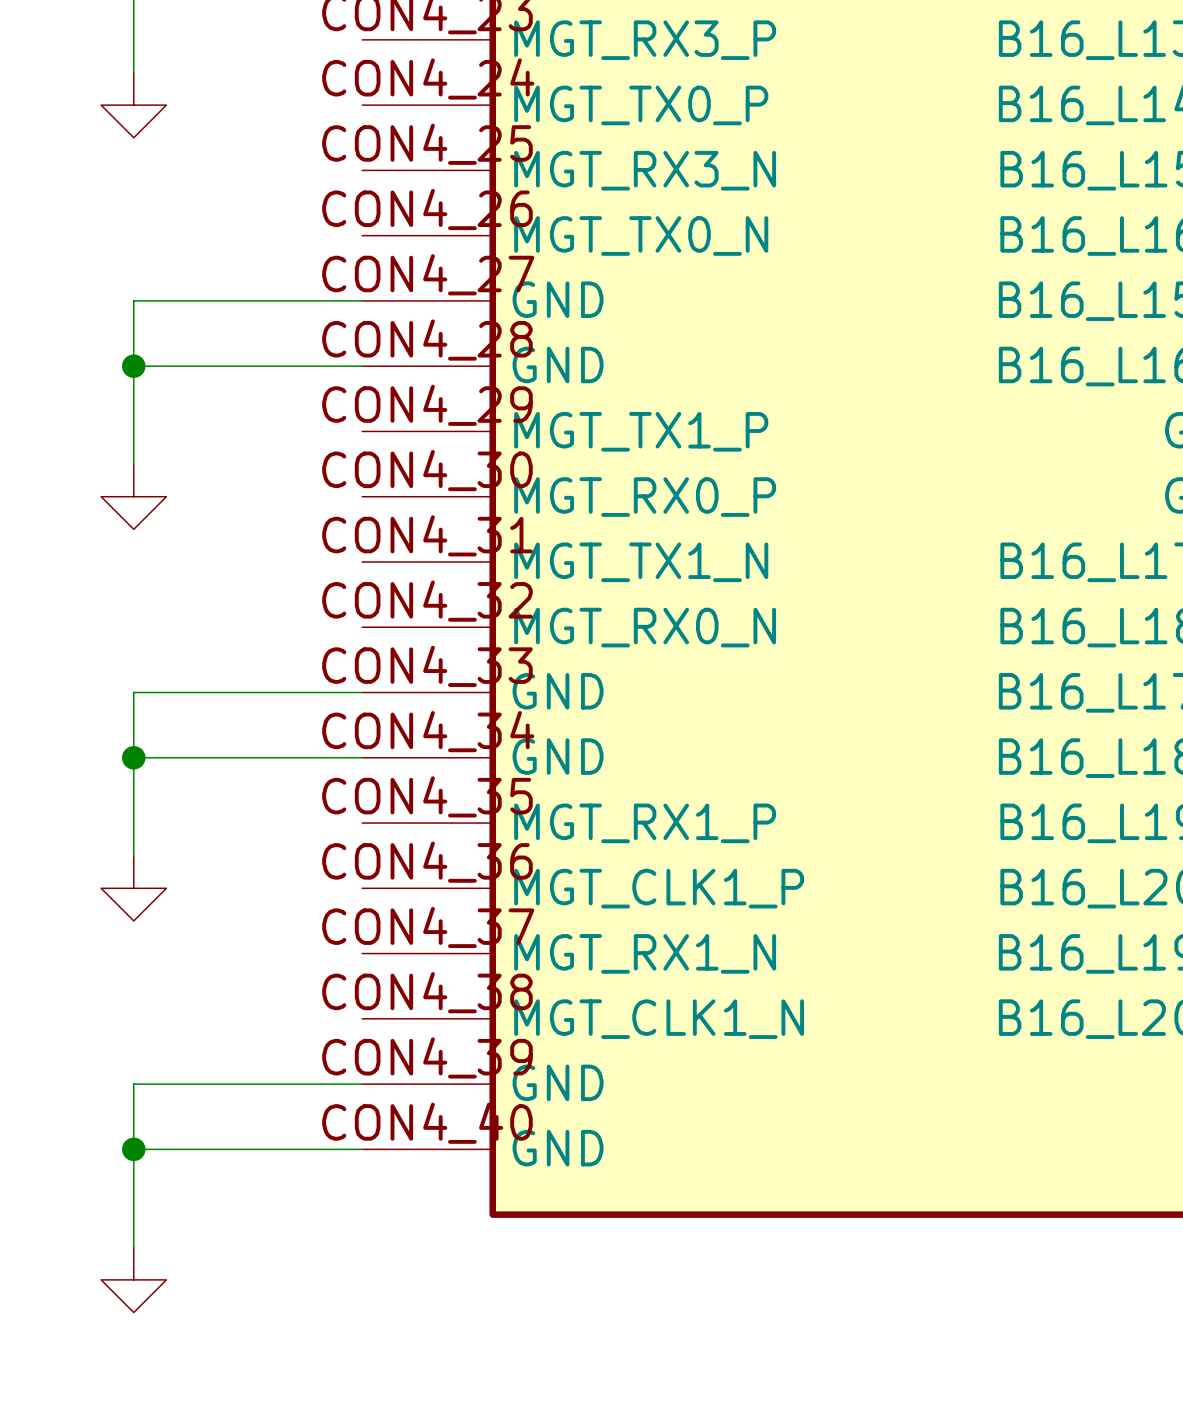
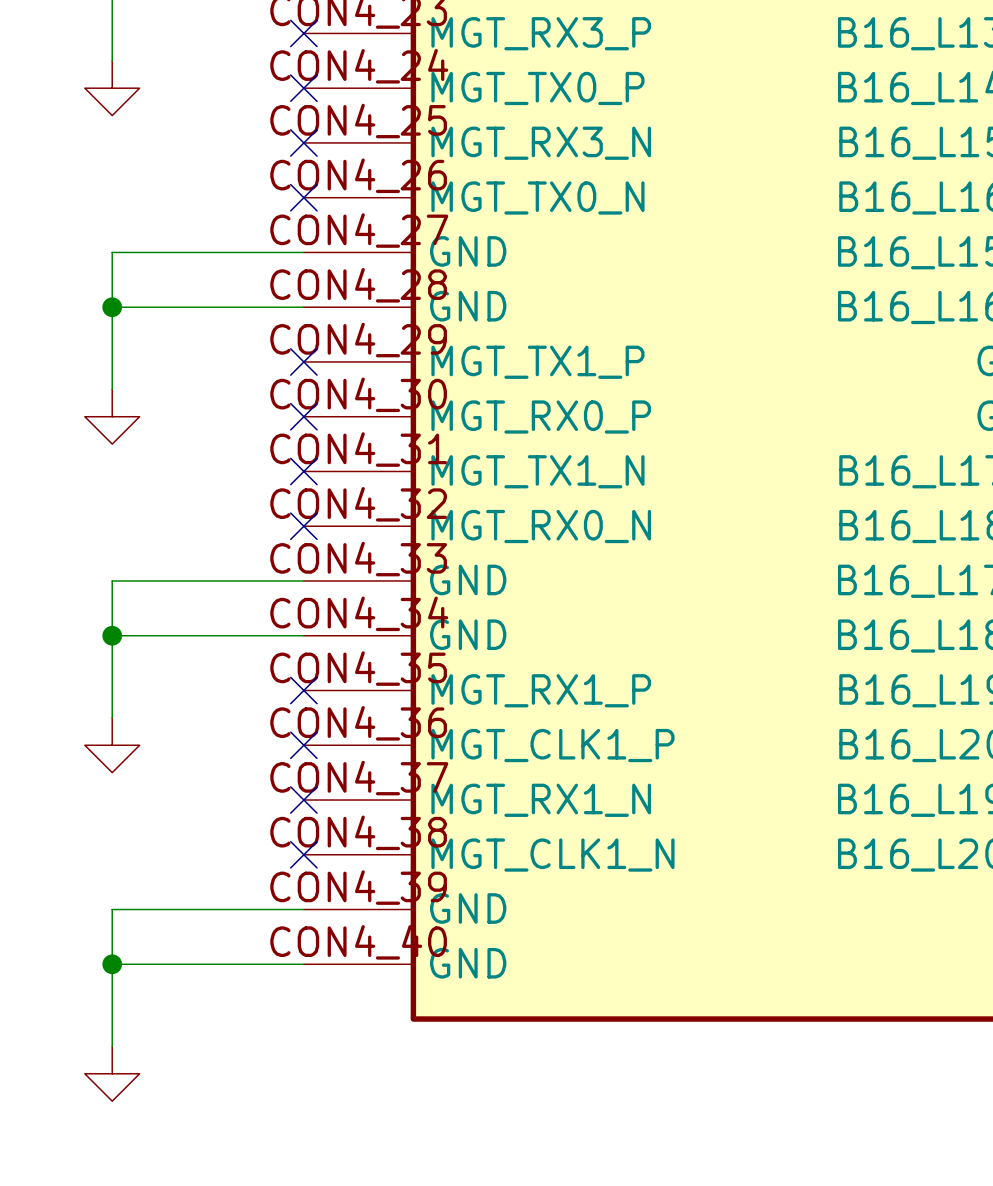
no-connect mark: none -> (303, 33)
no-connect mark: none -> (303, 88)
no-connect mark: none -> (303, 142)
no-connect mark: none -> (303, 197)
no-connect mark: none -> (303, 361)
no-connect mark: none -> (303, 416)
no-connect mark: none -> (303, 471)
no-connect mark: none -> (303, 526)
no-connect mark: none -> (303, 690)
no-connect mark: none -> (303, 745)
no-connect mark: none -> (303, 800)
no-connect mark: none -> (303, 854)

